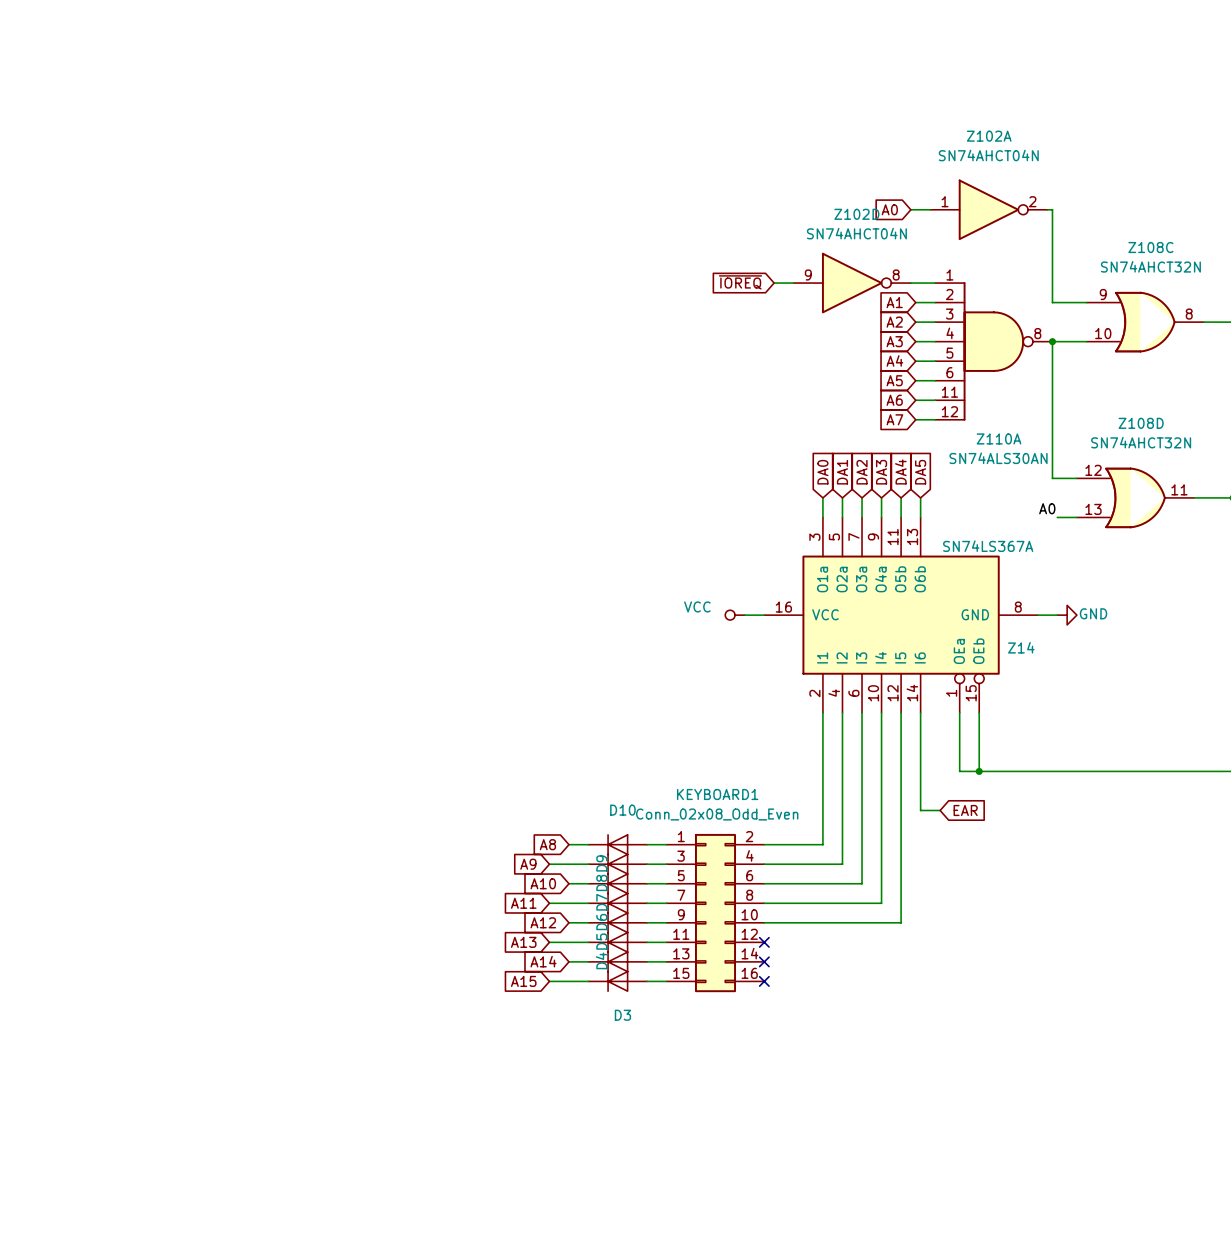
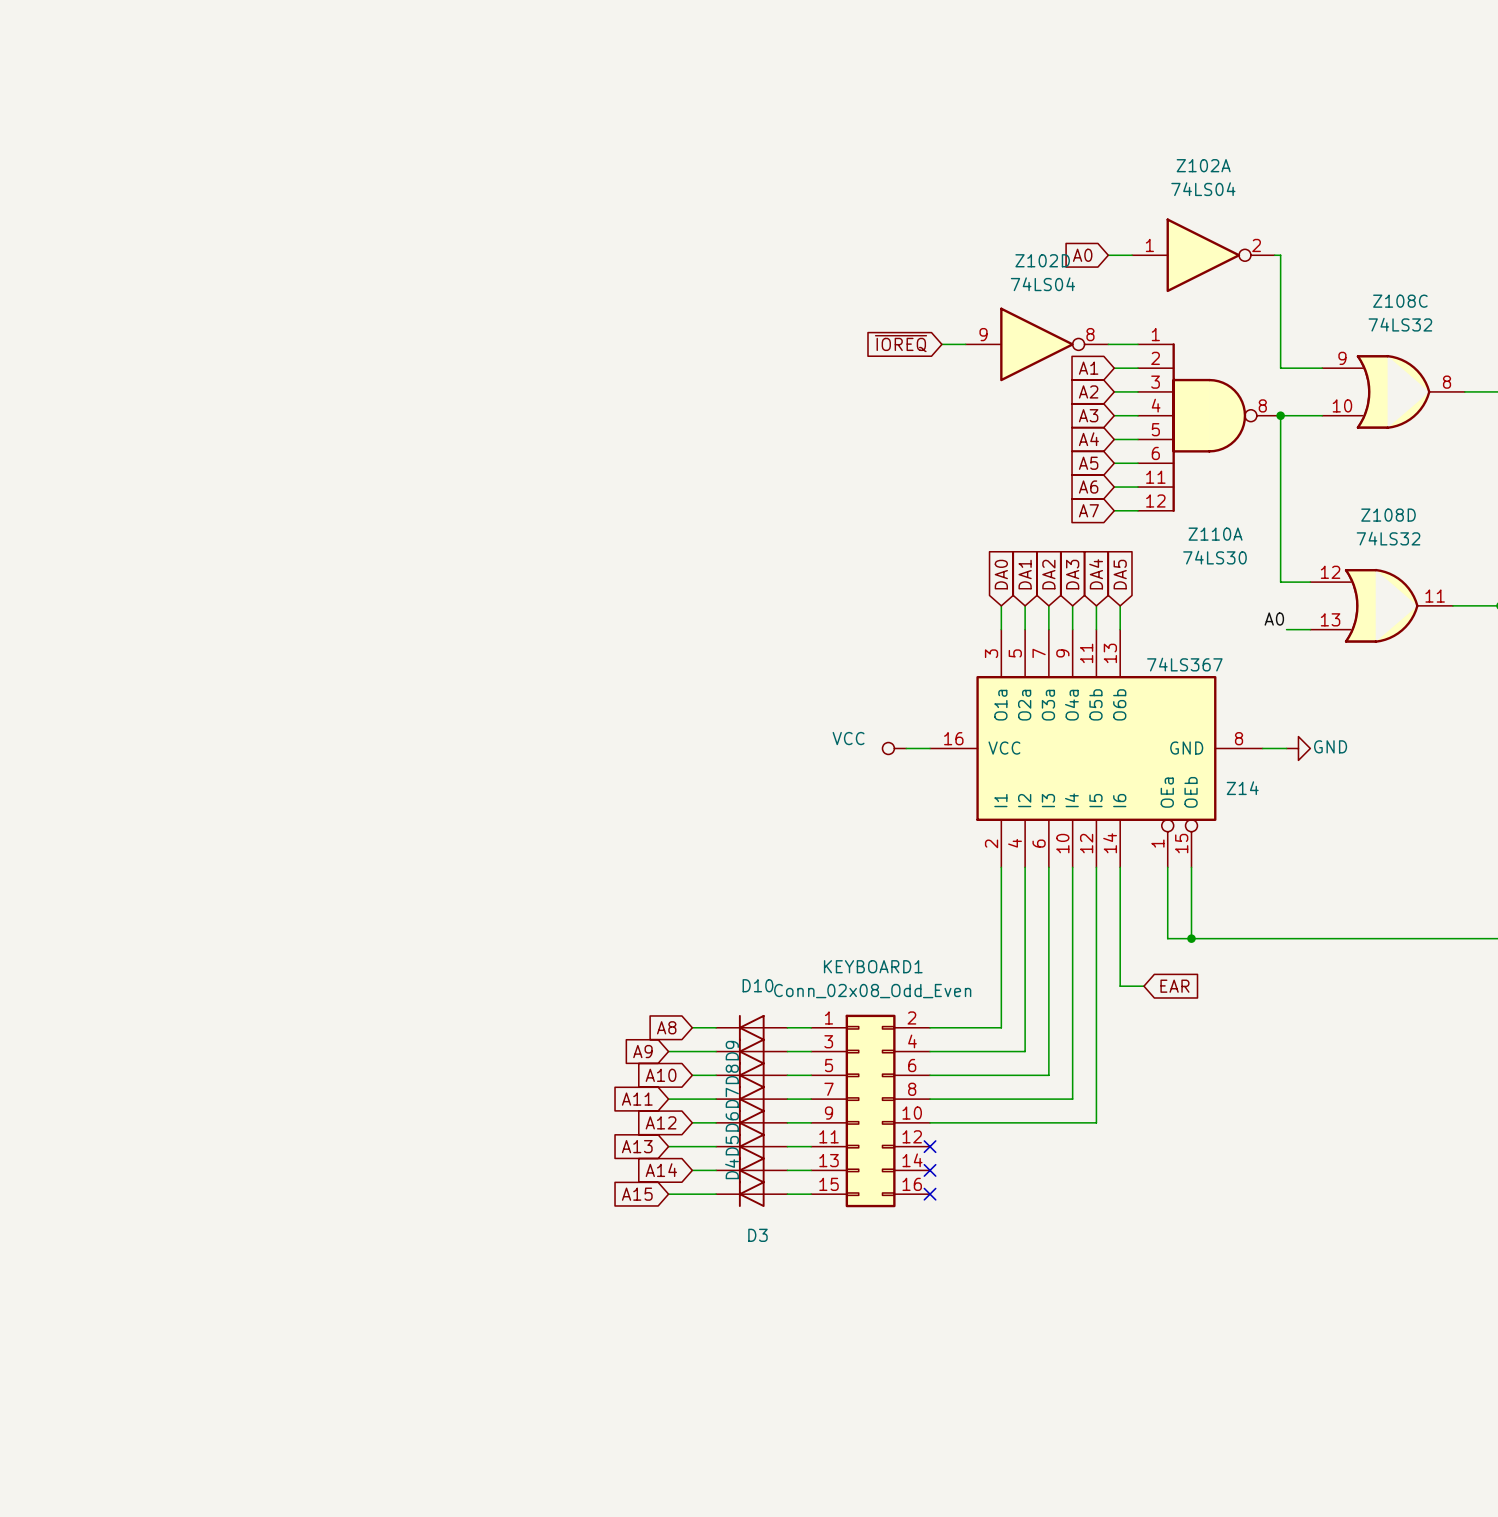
Z102A value: SN74AHCT04N (988, 155) -> 74LS04 (1203, 189)
Z102D value: SN74AHCT04N (856, 233) -> 74LS04 (1042, 284)
Z108C value: SN74AHCT32N (1150, 266) -> 74LS32 (1400, 324)
Z108D value: SN74AHCT32N (1141, 442) -> 74LS32 (1388, 538)
Z110A value: SN74ALS30AN (998, 458) -> 74LS30 (1214, 557)
Z14 value: SN74LS367A (988, 546) -> 74LS367 (1184, 664)

